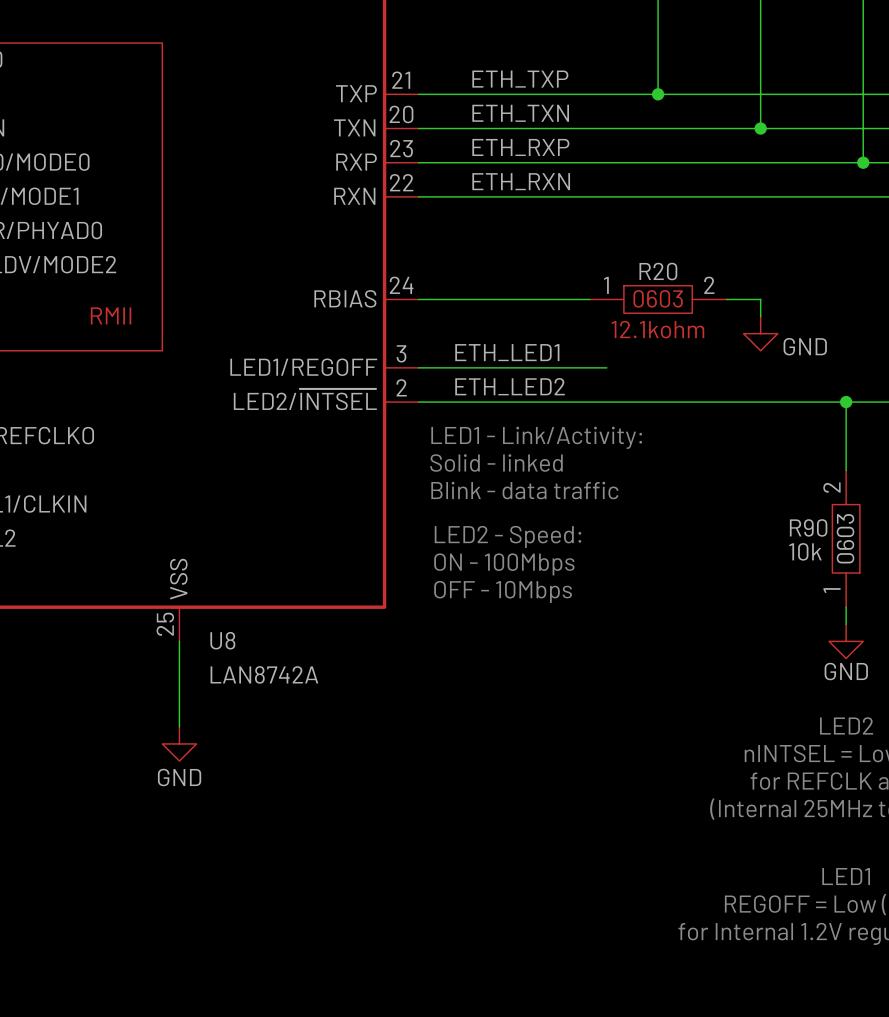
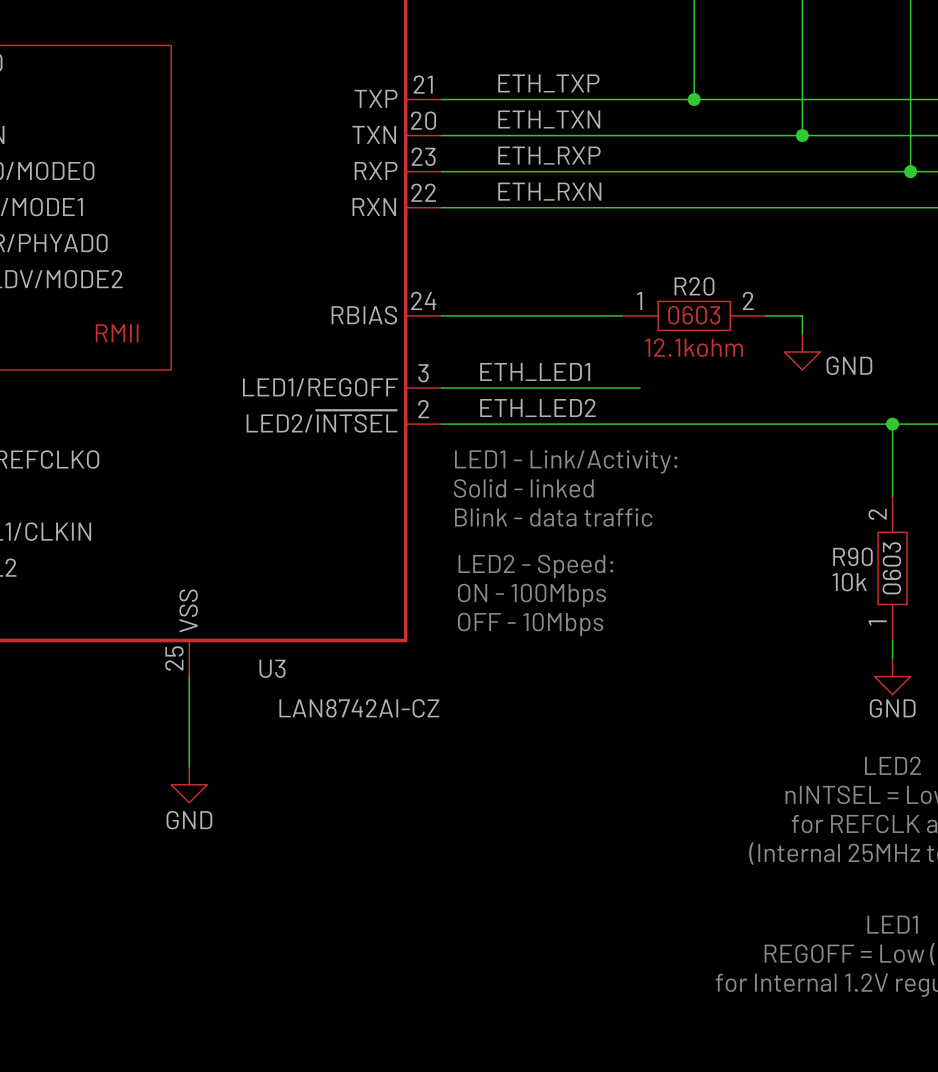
U8 name: U8 (222, 640) -> U3 (272, 668)
U8 value: LAN8742A (264, 674) -> LAN8742AI-CZ (359, 708)

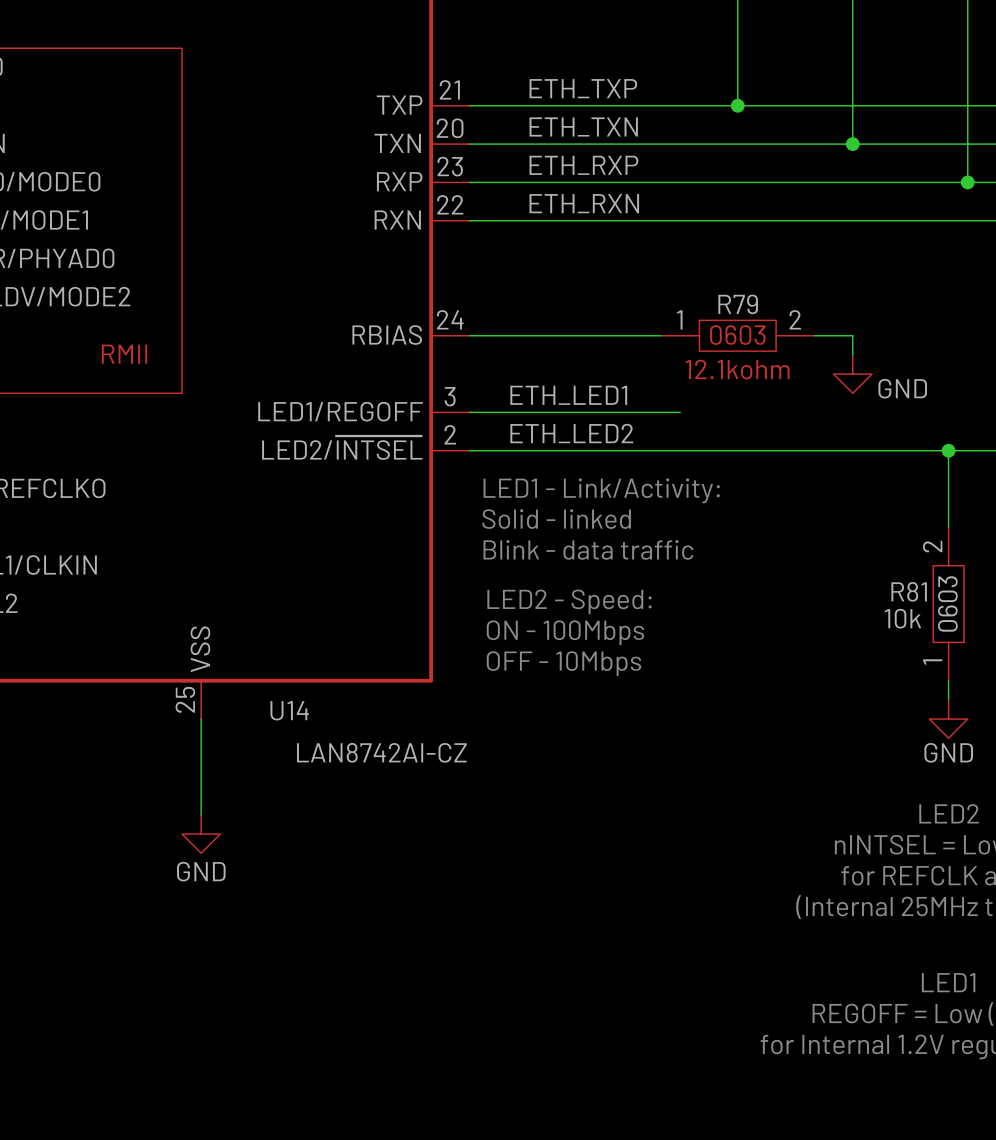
R20 name: R20 (694, 286) -> R79 (738, 304)
R90 name: R90 (852, 556) -> R81 (909, 591)
U3 name: U3 (272, 668) -> U14 (289, 710)

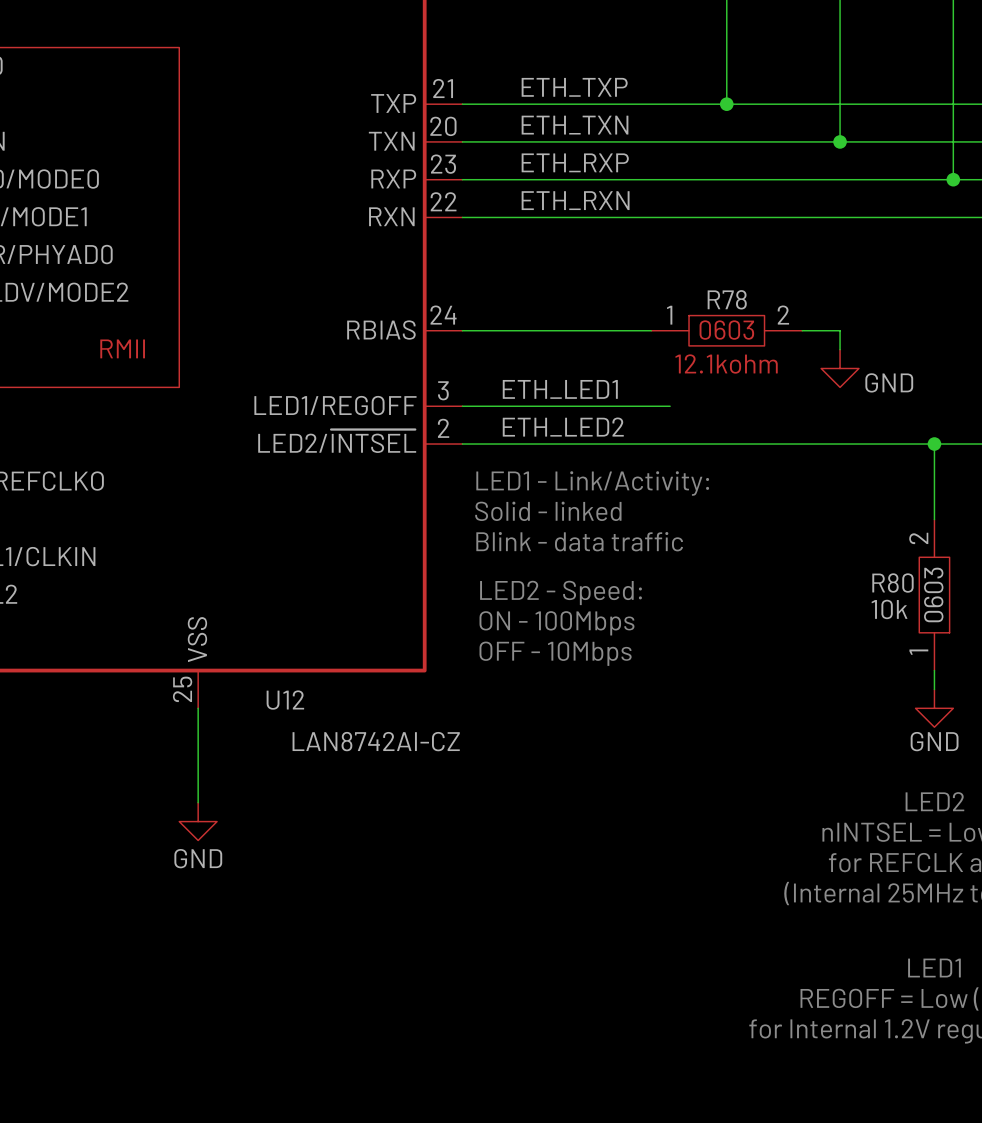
R79 name: R79 (738, 304) -> R78 (727, 299)
R81 name: R81 (909, 591) -> R80 (892, 583)
U14 name: U14 (289, 710) -> U12 (285, 700)

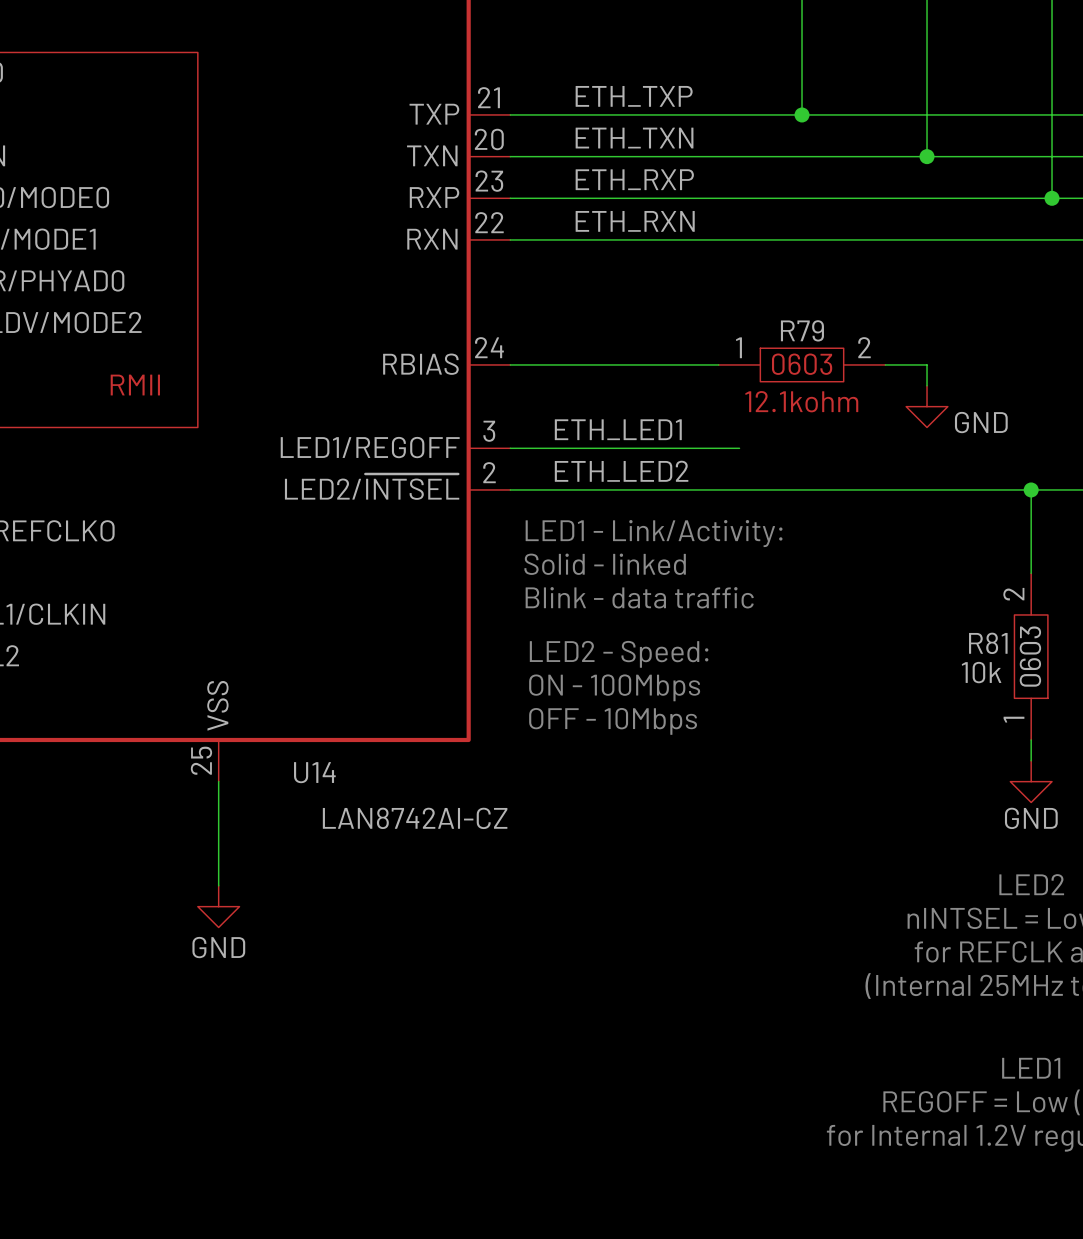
R78 name: R78 (727, 299) -> R79 (802, 330)
R80 name: R80 (892, 583) -> R81 (988, 643)
U12 name: U12 (285, 700) -> U14 (314, 772)

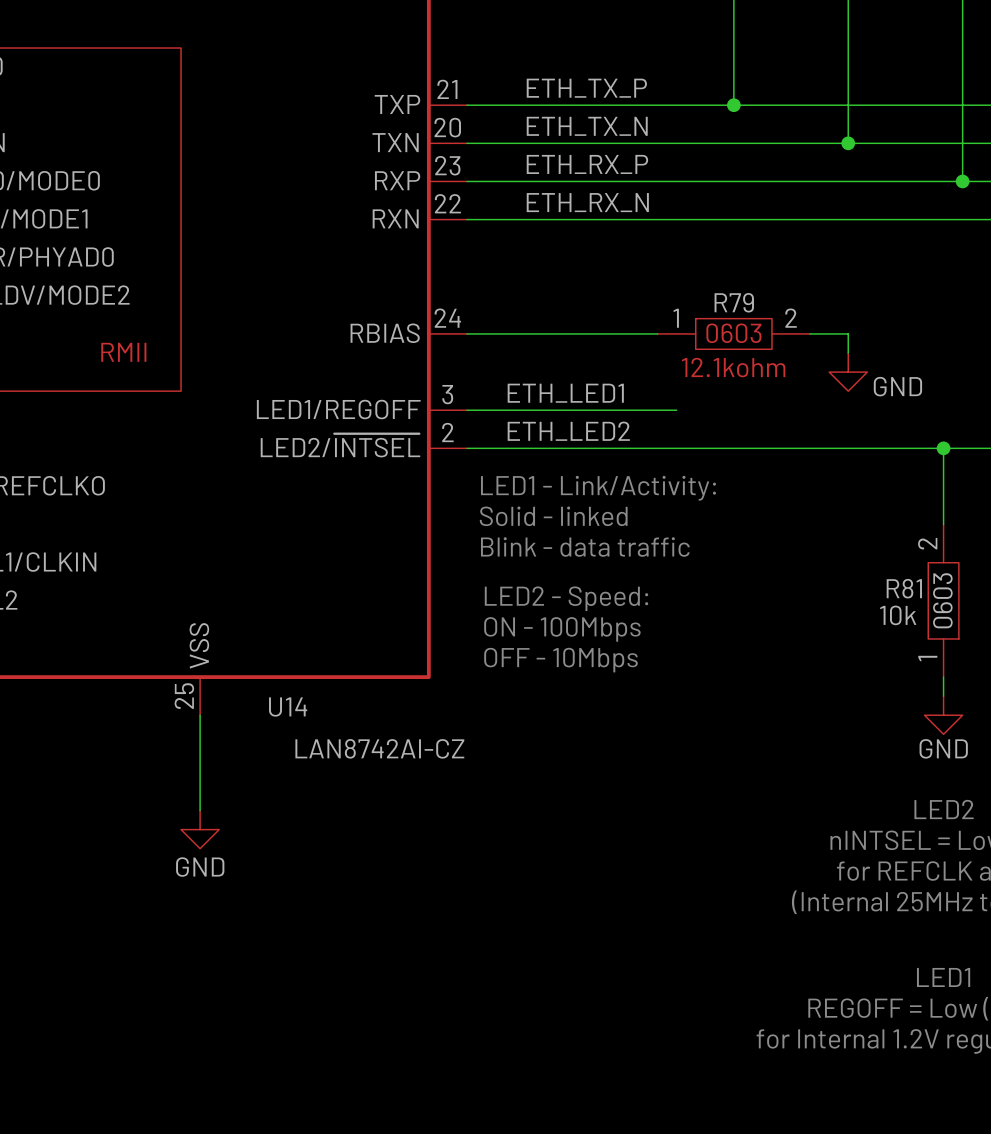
label: ETH_TXP (634, 96) -> ETH_TX_P (586, 88)
label: ETH_TXN (634, 138) -> ETH_TX_N (587, 126)
label: ETH_RXP (634, 179) -> ETH_RX_P (587, 164)
label: ETH_RXN (635, 221) -> ETH_RX_N (587, 202)

